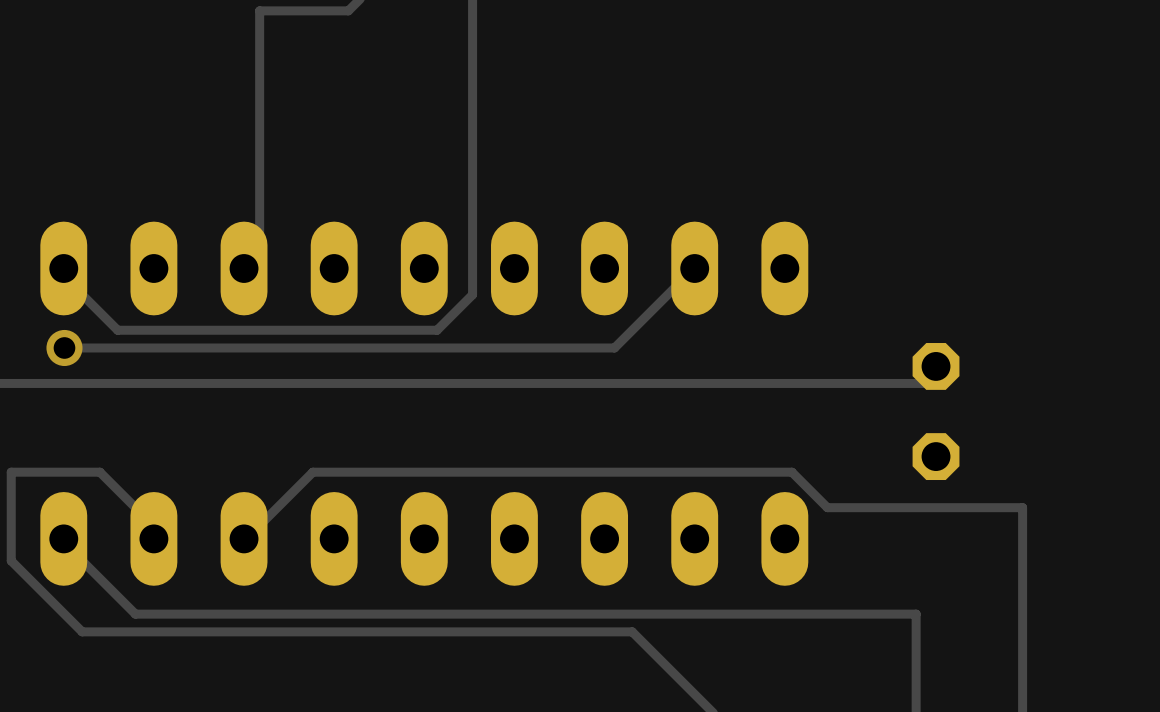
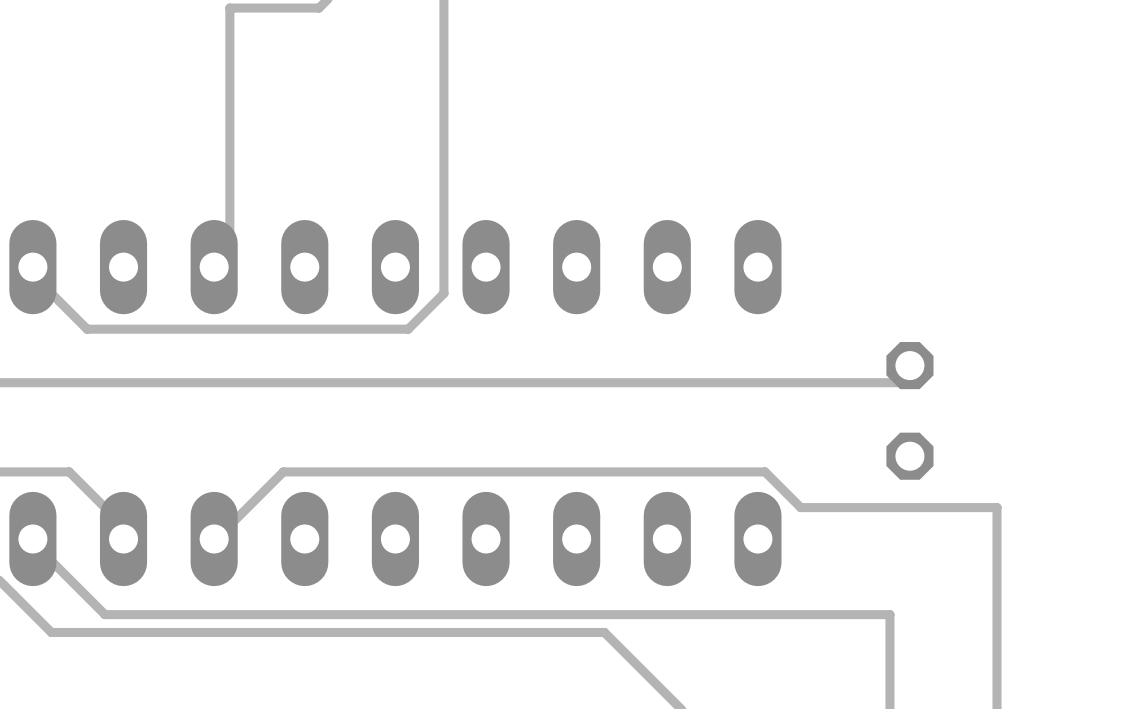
track: (694, 268) (614, 347) (64, 347) -> none
via: (64, 347) -> none

